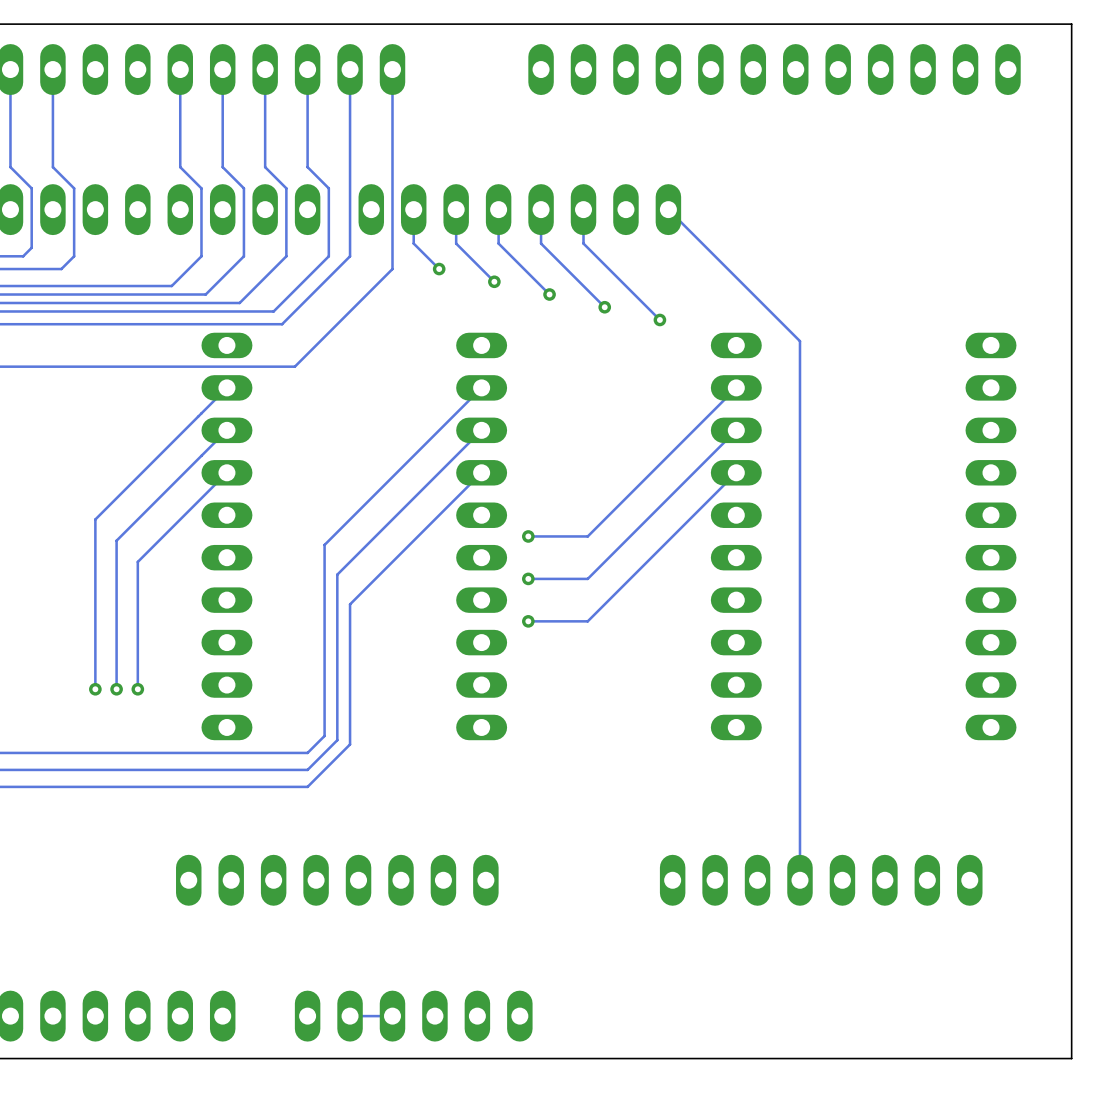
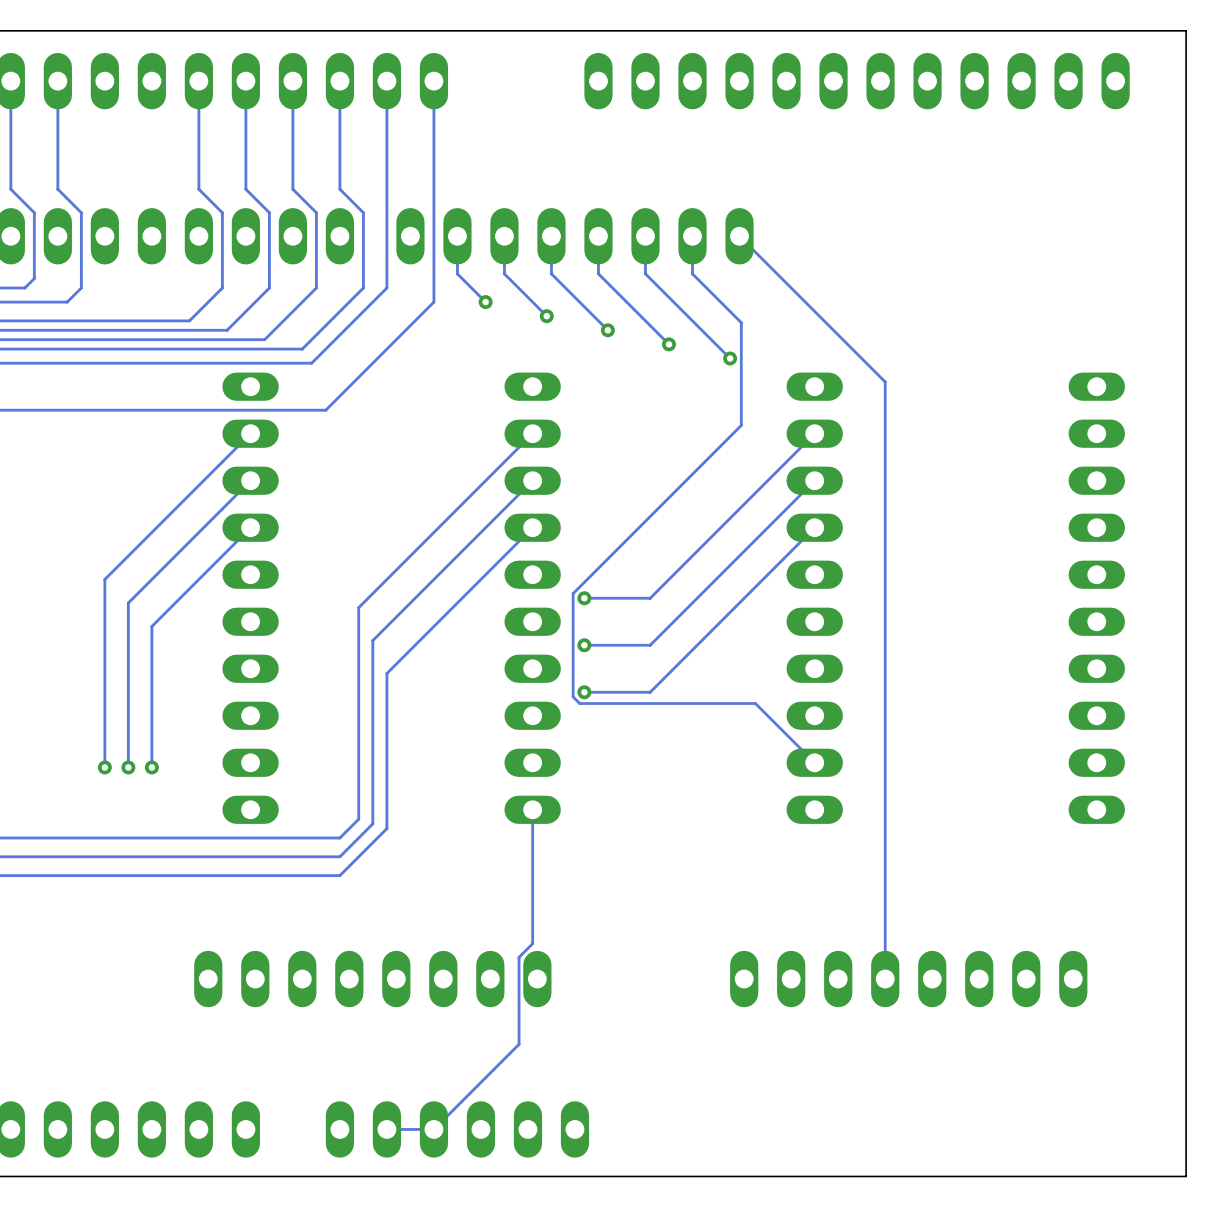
track: none -> (692, 236) (692, 273) (741, 322) (741, 425) (573, 593) (573, 696) (579, 703) (755, 703) (814, 762)
track: none -> (532, 809) (532, 943) (519, 957) (519, 1044) (433, 1129)

